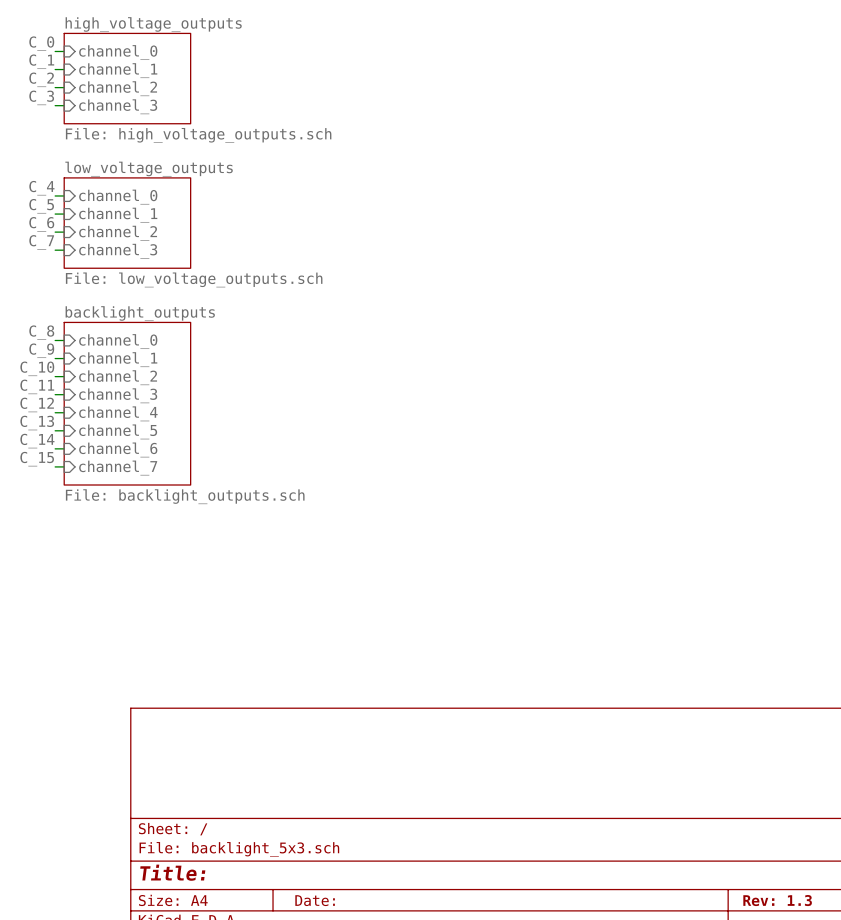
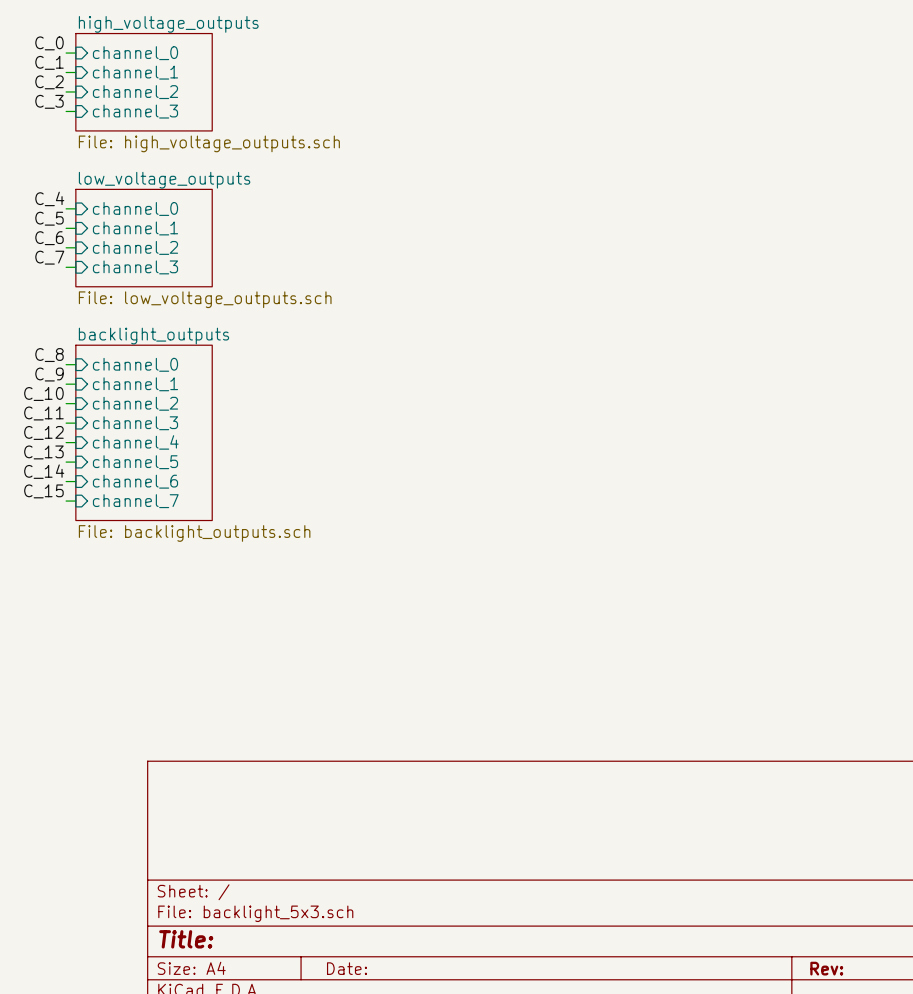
title block: Rev: 1.3 (777, 900) -> Rev: (826, 968)

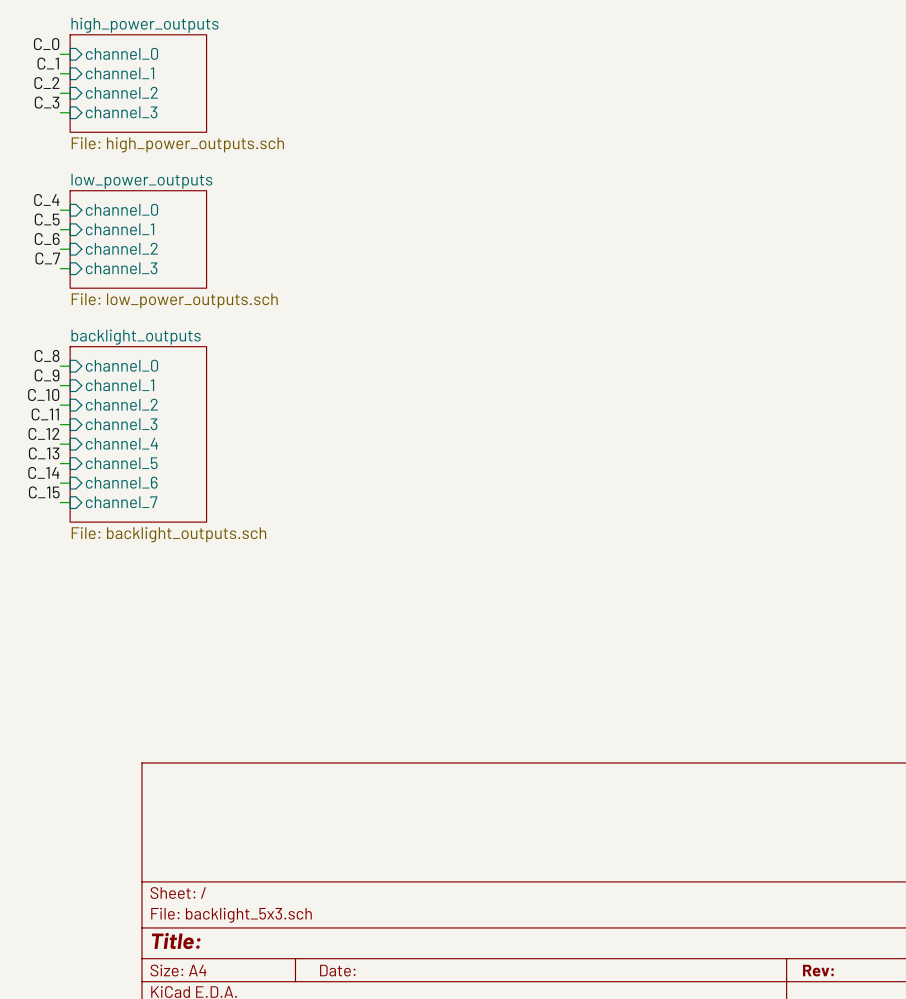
sheet high_voltage_outputs name: high_voltage_outputs (168, 24) -> high_power_outputs (144, 25)
sheet high_voltage_outputs value: File: high_voltage_outputs.sch (209, 143) -> File: high_power_outputs.sch (177, 144)
sheet low_voltage_outputs name: low_voltage_outputs (164, 180) -> low_power_outputs (141, 181)
sheet low_voltage_outputs value: File: low_voltage_outputs.sch (205, 299) -> File: low_power_outputs.sch (174, 300)

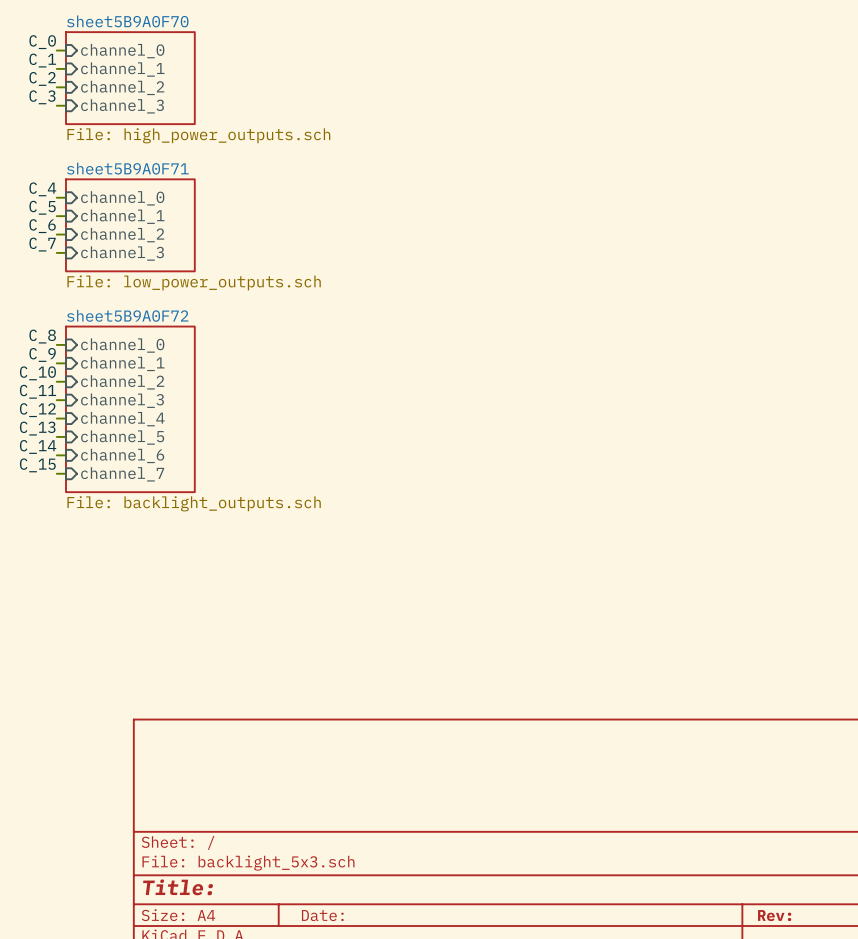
sheet high_power_outputs name: high_power_outputs (144, 25) -> sheet5B9A0F70 (127, 21)
sheet low_power_outputs name: low_power_outputs (141, 181) -> sheet5B9A0F71 (127, 168)
sheet backlight_outputs name: backlight_outputs (136, 337) -> sheet5B9A0F72 (127, 315)

